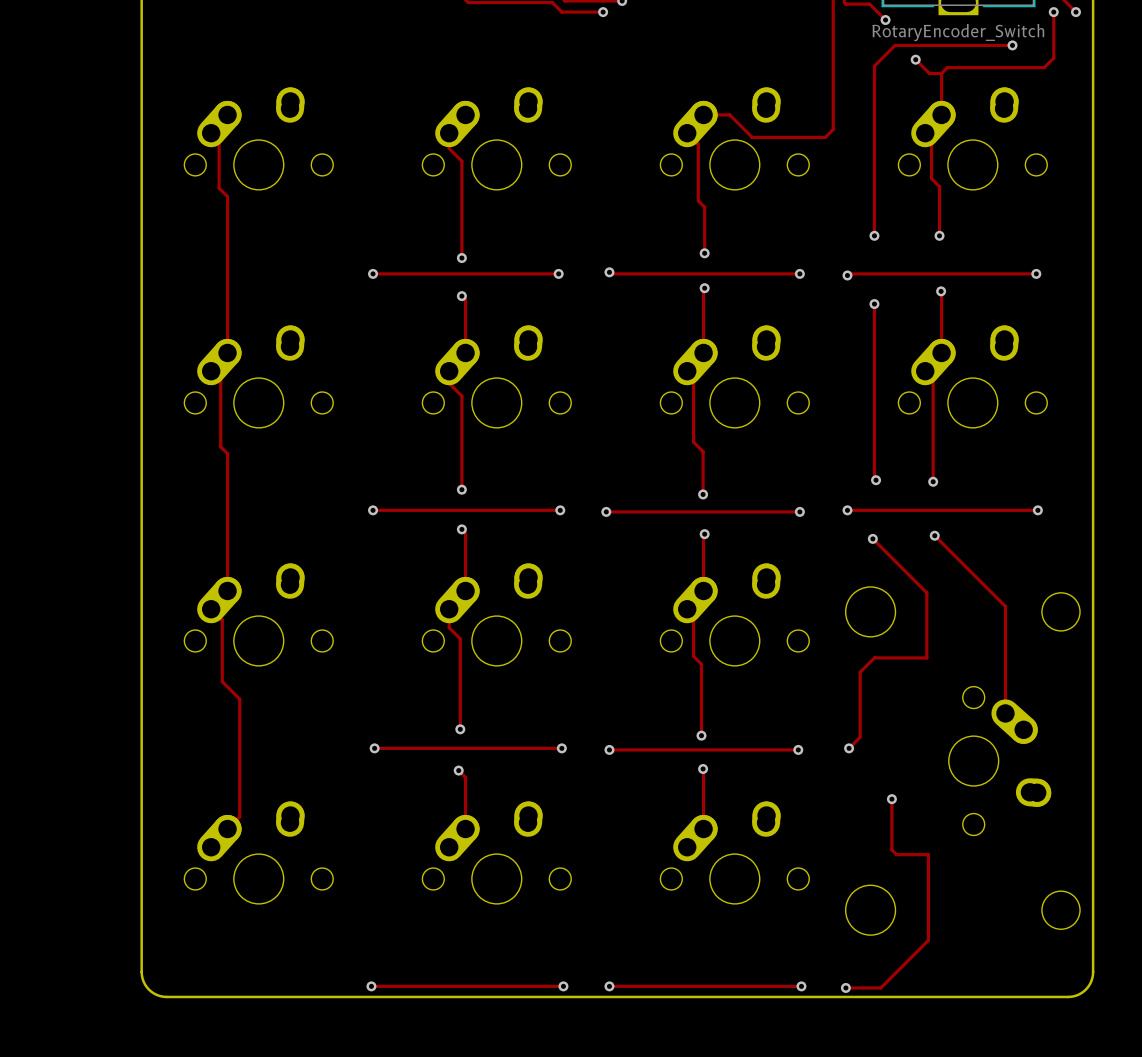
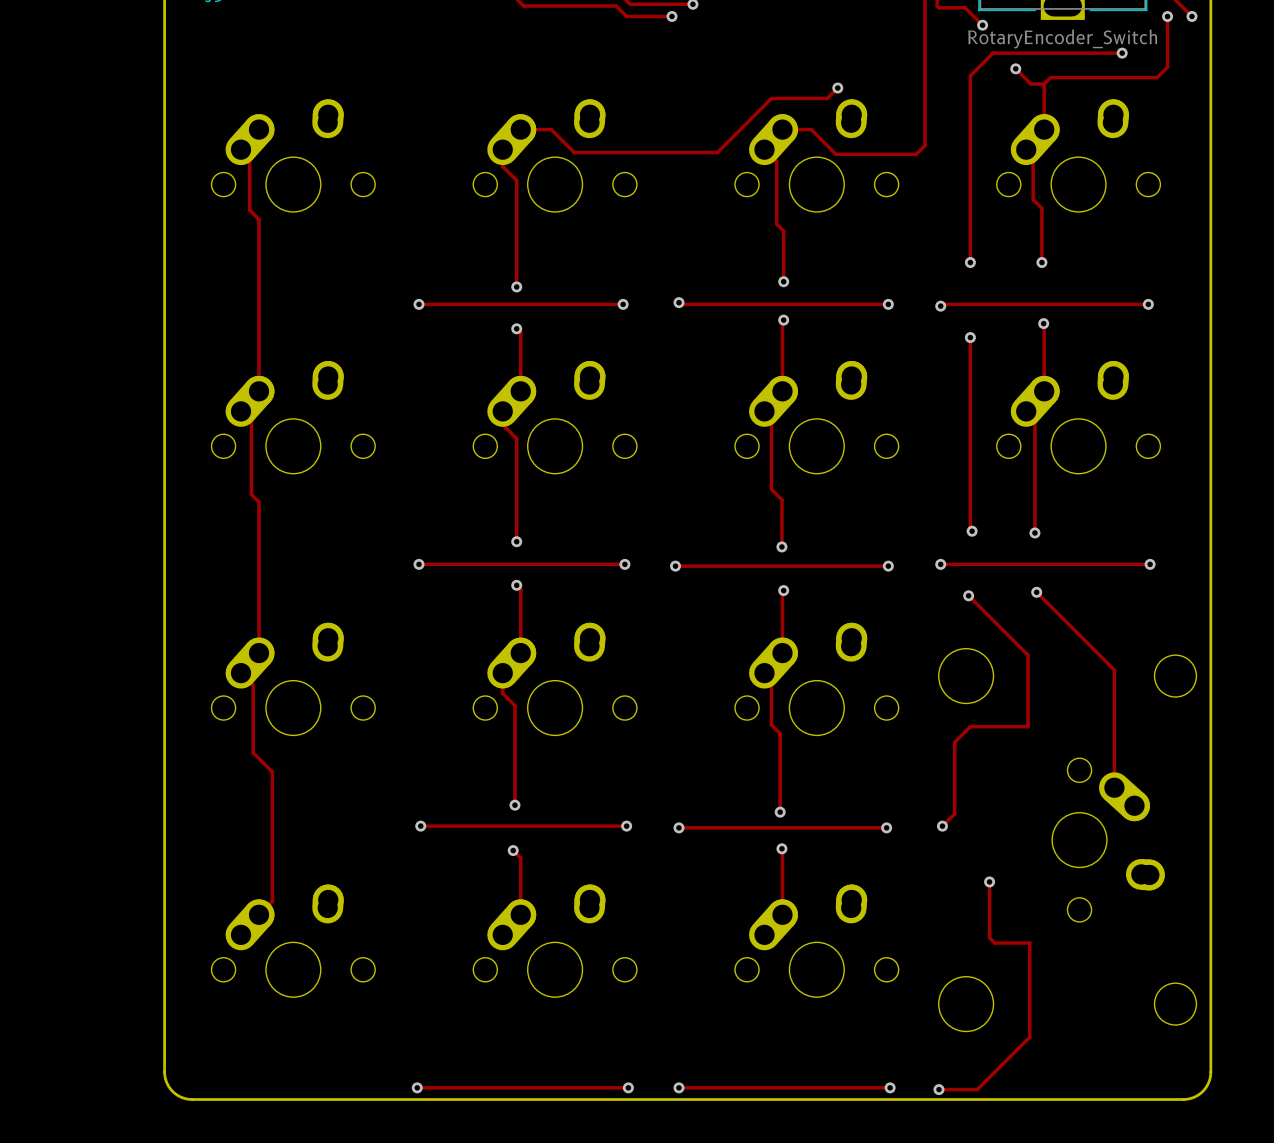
track: none -> (837, 88) (827, 98) (771, 98) (717, 152) (574, 152) (551, 129) (520, 129)
via: none -> (837, 88)

